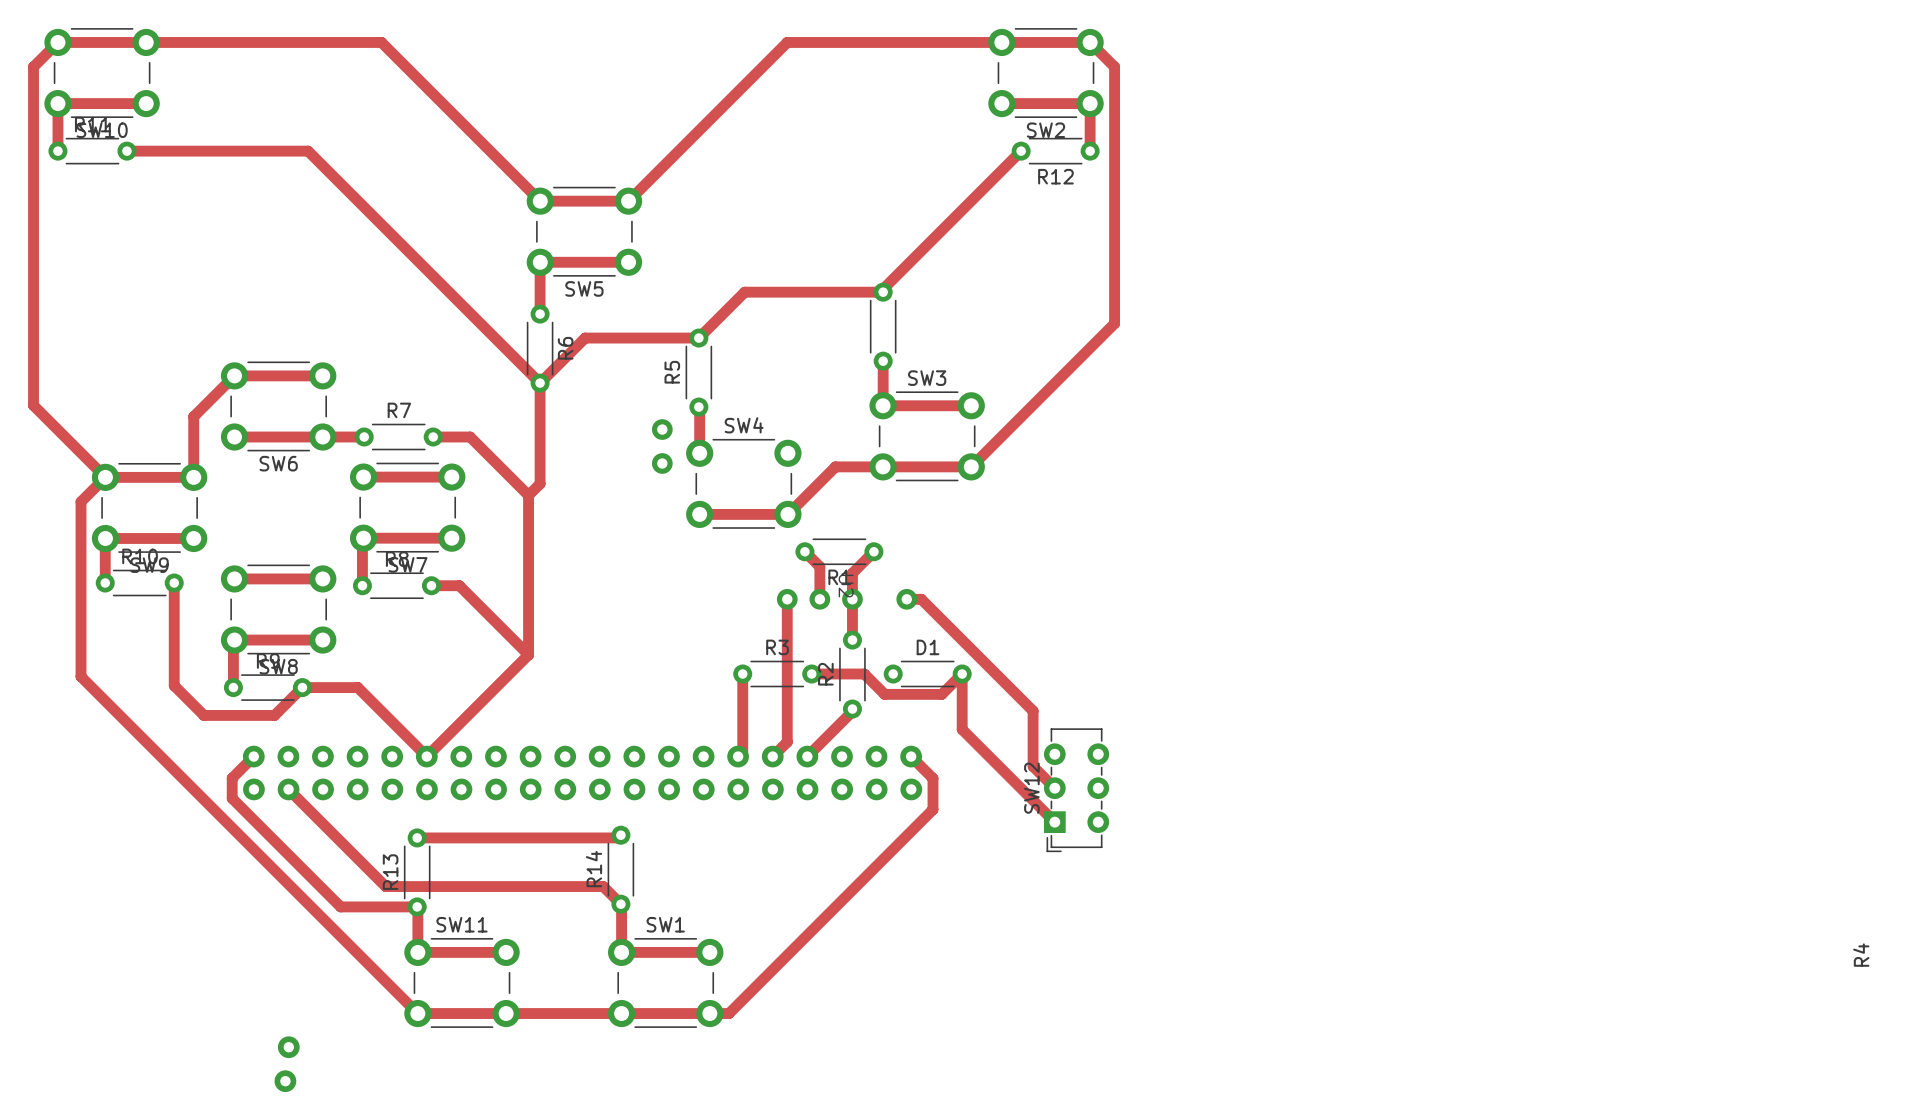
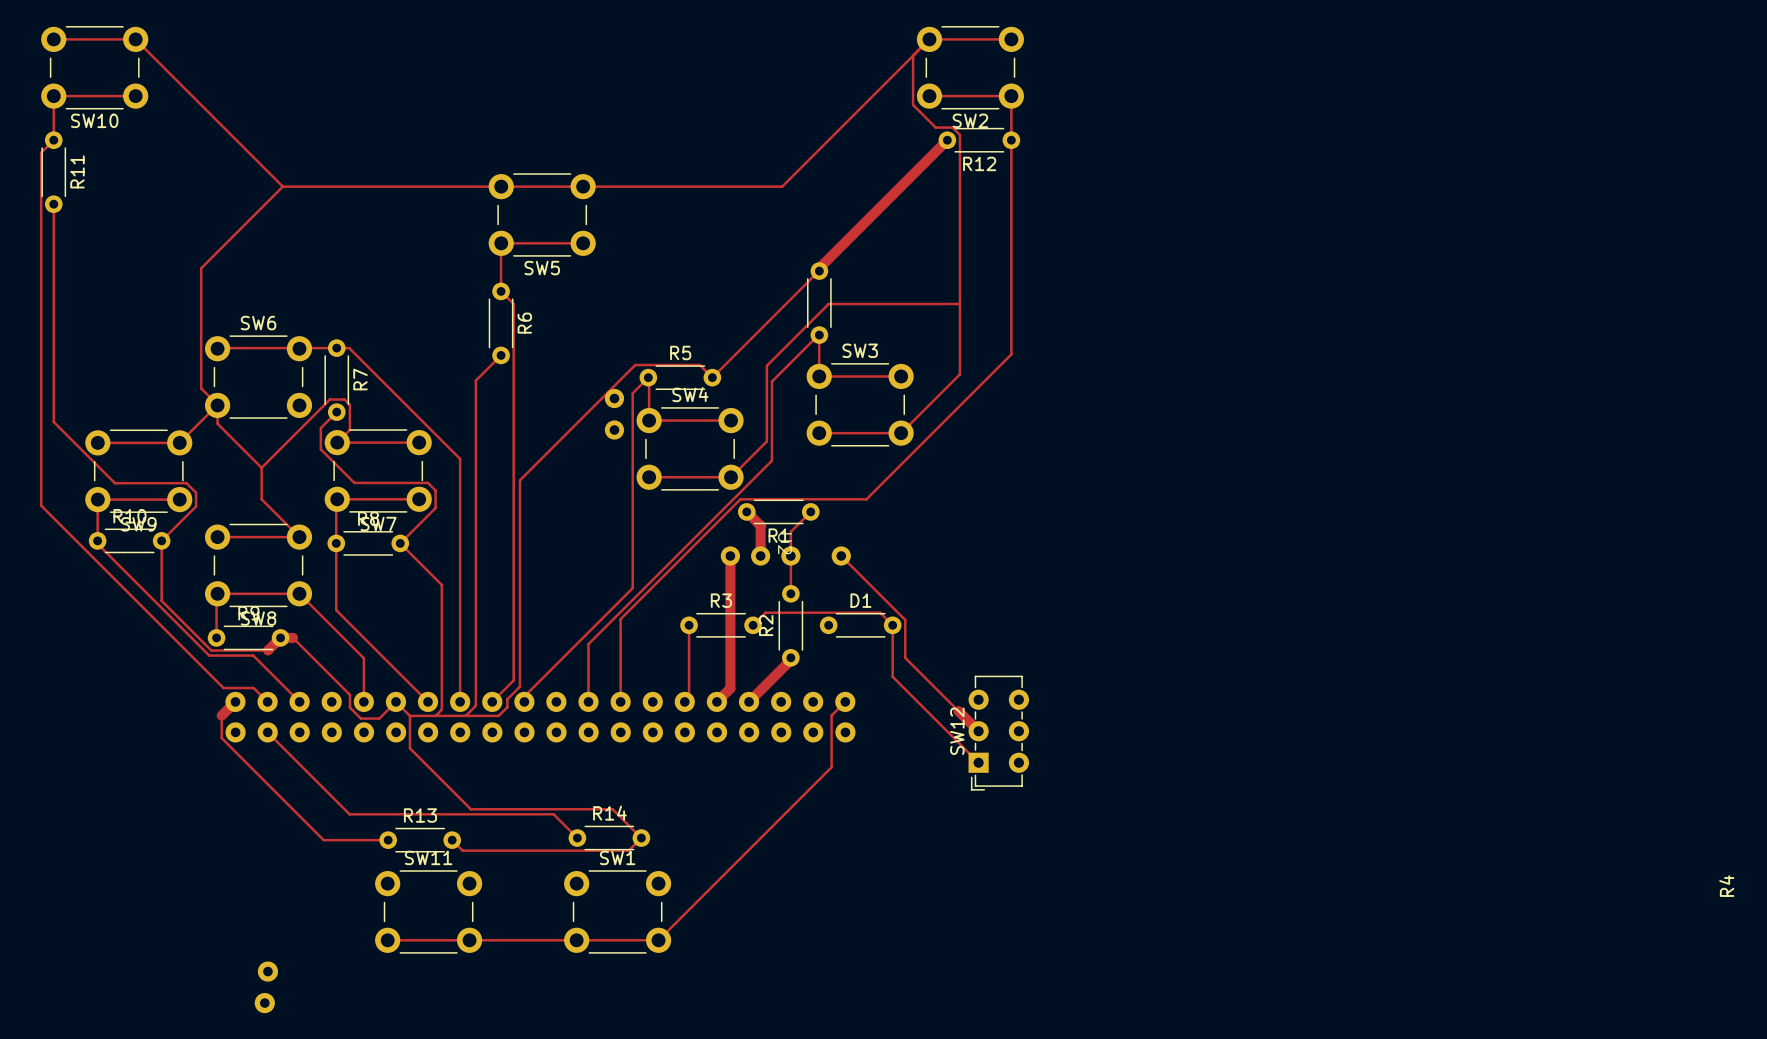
track: (57, 42) (33, 66) (33, 405) (105, 477) (81, 501) (81, 676) (417, 1013) -> none
track width: thick (57, 42) (146, 42) -> thin (53, 39) (135, 39)
track: (146, 42) (381, 42) (540, 201) -> (282, 186) (501, 186)
track: none -> (135, 39) (282, 186)
track: (1001, 42) (787, 42) (628, 201) -> (929, 39) (782, 186) (583, 186)
track width: thick (1001, 42) (1090, 42) -> thin (929, 39) (1011, 39)
track: (1090, 42) (1114, 66) (1114, 323) (1034, 403) -> (913, 55) (913, 104) (935, 127) (952, 127) (959, 134) (959, 374)
track width: thick (146, 103) (57, 103) (57, 151) -> thin (135, 96) (53, 96) (53, 140)
track width: thick (1001, 103) (1090, 103) (1090, 151) -> thin (929, 96) (1011, 96) (1011, 140)
track: none -> (53, 140) (41, 152) (41, 505) (223, 688) (253, 688) (267, 701)
R11 rotation: 0° (92, 151) -> 90° clockwise (53, 172)
track: (126, 151) (308, 151) (540, 383) -> none
track: none -> (1011, 140) (1011, 354) (866, 499) (740, 499) (620, 619) (620, 701)
track: none -> (282, 186) (201, 268) (201, 388) (217, 404)
track width: thick (540, 201) (628, 201) -> thin (501, 186) (583, 186)
track: none -> (53, 204) (53, 421) (114, 483) (186, 483) (196, 492) (196, 506) (161, 540)
track width: thick (540, 262) (628, 262) -> thin (501, 243) (583, 243)
track width: thick (540, 262) (540, 314) -> thin (501, 243) (501, 291)
track: (882, 292) (744, 292) (698, 338) (585, 338) (540, 383) -> (819, 271) (712, 377) (699, 365) (635, 365) (519, 480) (519, 686) (507, 699) (507, 707) (498, 715) (409, 715)
track: none -> (501, 291) (513, 304) (513, 680) (492, 701)
track: (883, 361) (883, 405) -> (588, 701) (588, 644) (771, 460) (771, 381) (819, 334) (819, 376)
R5 rotation: 0° (698, 372) -> 90° clockwise (680, 377)
track: none -> (217, 348) (349, 348) (460, 458) (460, 701)
track: (322, 375) (234, 375) (193, 416) (193, 477) -> (217, 404) (179, 442)
track: (540, 383) (540, 483) (528, 495) -> (501, 355) (475, 380) (475, 705) (465, 715)
track width: thick (1034, 403) (971, 466) (883, 466) -> thin (959, 374) (901, 433) (819, 433)
track width: thick (883, 405) (971, 405) -> thin (819, 376) (901, 376)
track: none -> (648, 377) (632, 393) (632, 588) (524, 696) (524, 701)
track width: thick (698, 407) (699, 453) -> thin (648, 377) (649, 420)
track: none -> (217, 404) (217, 423) (261, 467)
track: (234, 437) (364, 437) -> none
R7 rotation: 0° (398, 437) -> 90° clockwise (336, 380)
track: (433, 437) (470, 437) (528, 495) -> none
track: none -> (336, 412) (320, 427) (320, 449) (354, 482) (427, 482) (435, 490) (435, 508) (400, 543) (441, 584) (441, 709) (435, 715)
track: none -> (649, 420) (731, 420)
SW6 name position: SW6 (278, 463) -> SW6 (258, 323)
track: (883, 466) (835, 466) (826, 475) -> (959, 304) (828, 304) (766, 365) (766, 441)
track: none -> (336, 441) (349, 430) (349, 404) (344, 399) (329, 399) (261, 467)
track width: thick (826, 475) (787, 514) (699, 514) -> thin (766, 441) (731, 477) (649, 477)
track width: thick (105, 477) (193, 477) -> thin (97, 442) (179, 442)
track width: thick (363, 477) (451, 477) -> thin (337, 442) (419, 442)
track: (528, 495) (528, 654) -> none
track: none -> (261, 467) (261, 499) (299, 537)
track width: thick (193, 538) (105, 538) (105, 583) -> thin (179, 499) (97, 499) (97, 540)
track width: thick (451, 538) (363, 538) (362, 585) -> thin (419, 499) (337, 499) (336, 543)
track width: thick (873, 551) (852, 573) (852, 640) -> thin (810, 511) (790, 531) (790, 593)
track width: thick (234, 578) (322, 578) -> thin (217, 537) (299, 537)
track: none -> (97, 540) (97, 543) (209, 655) (253, 655) (299, 701)
track width: thick (174, 583) (174, 647) -> thin (161, 540) (161, 600)
track: none -> (336, 543) (336, 610) (427, 701)
track: (431, 585) (459, 585) (528, 654) -> none
track: (906, 599) (921, 599) (1033, 710) (1033, 766) -> (841, 556) (905, 620) (905, 657) (958, 711)
track: none -> (299, 593) (363, 658) (363, 701)
track width: thick (322, 640) (234, 640) (233, 687) -> thin (299, 593) (217, 593) (216, 637)
track: (174, 647) (174, 685) (203, 715) (274, 715) (288, 701) -> (161, 600) (211, 650) (267, 650)
track: (528, 654) (426, 756) (357, 687) (315, 687) -> (409, 715) (395, 701) (379, 718) (360, 718) (349, 707) (349, 694) (293, 637)
track width: thick (742, 674) (742, 751) (738, 756) -> thin (689, 625) (689, 697) (684, 701)
track: (811, 674) (864, 674) (884, 694) (941, 694) (962, 674) -> (753, 625) (765, 612) (880, 612) (892, 625)
track width: thick (962, 674) (962, 729) (1054, 822) -> thin (892, 625) (892, 676) (978, 762)
track: (911, 756) (932, 778) (932, 809) (729, 1013) (709, 1013) -> (845, 701) (831, 715) (831, 767) (658, 940)
track: (238, 771) (232, 778) (232, 798) (340, 906) (417, 906) (417, 952) (506, 952) -> (221, 715) (221, 738) (323, 840) (388, 840)
track: none -> (409, 715) (409, 748) (470, 809) (612, 809) (641, 838) (628, 850) (462, 850) (452, 840)
track width: thick (288, 789) (376, 877) -> thin (267, 732) (349, 814)
track: (620, 835) (618, 837) (417, 837) -> none
R14 rotation: 0° (620, 869) -> 90° clockwise (609, 838)
R13 rotation: 0° (417, 872) -> 90° clockwise (420, 840)
track: (376, 877) (385, 886) (603, 886) (621, 904) (621, 952) (709, 952) -> (349, 814) (553, 814) (577, 838)
track width: thick (417, 1013) (709, 1013) -> thin (387, 940) (658, 940)

